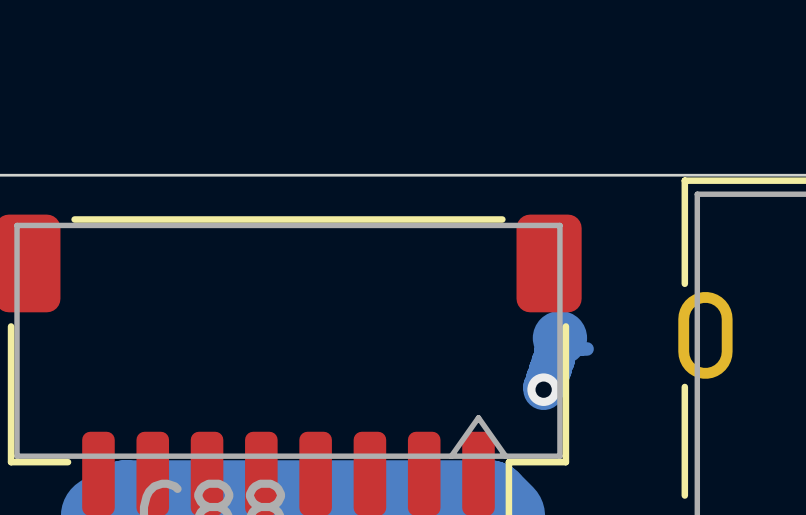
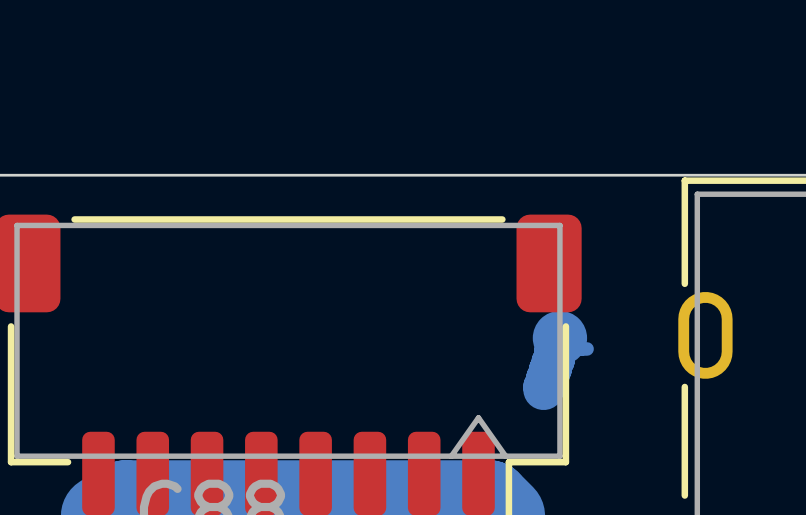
via: (543, 389) -> none

